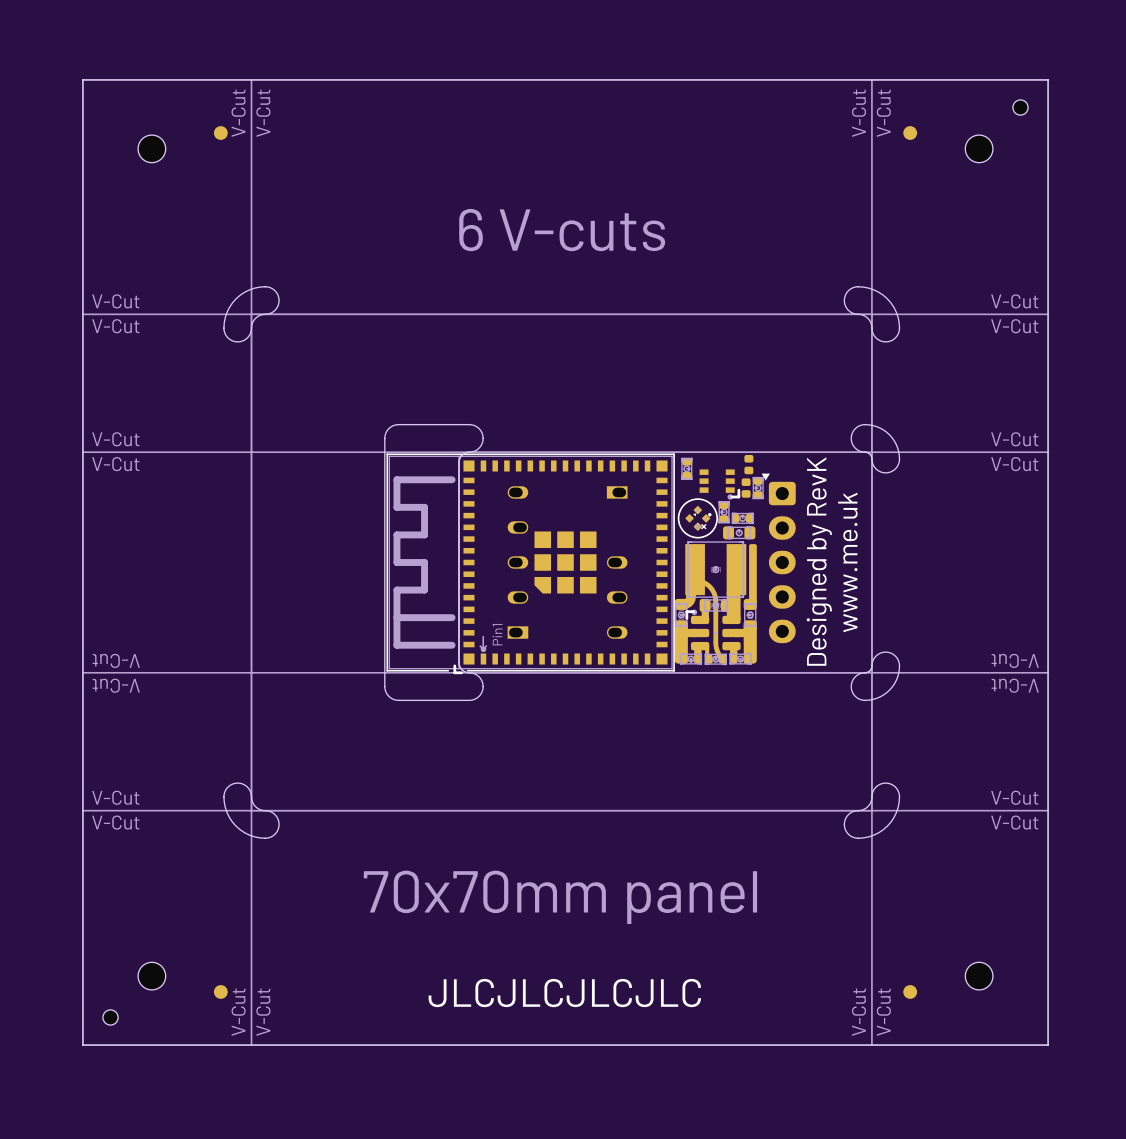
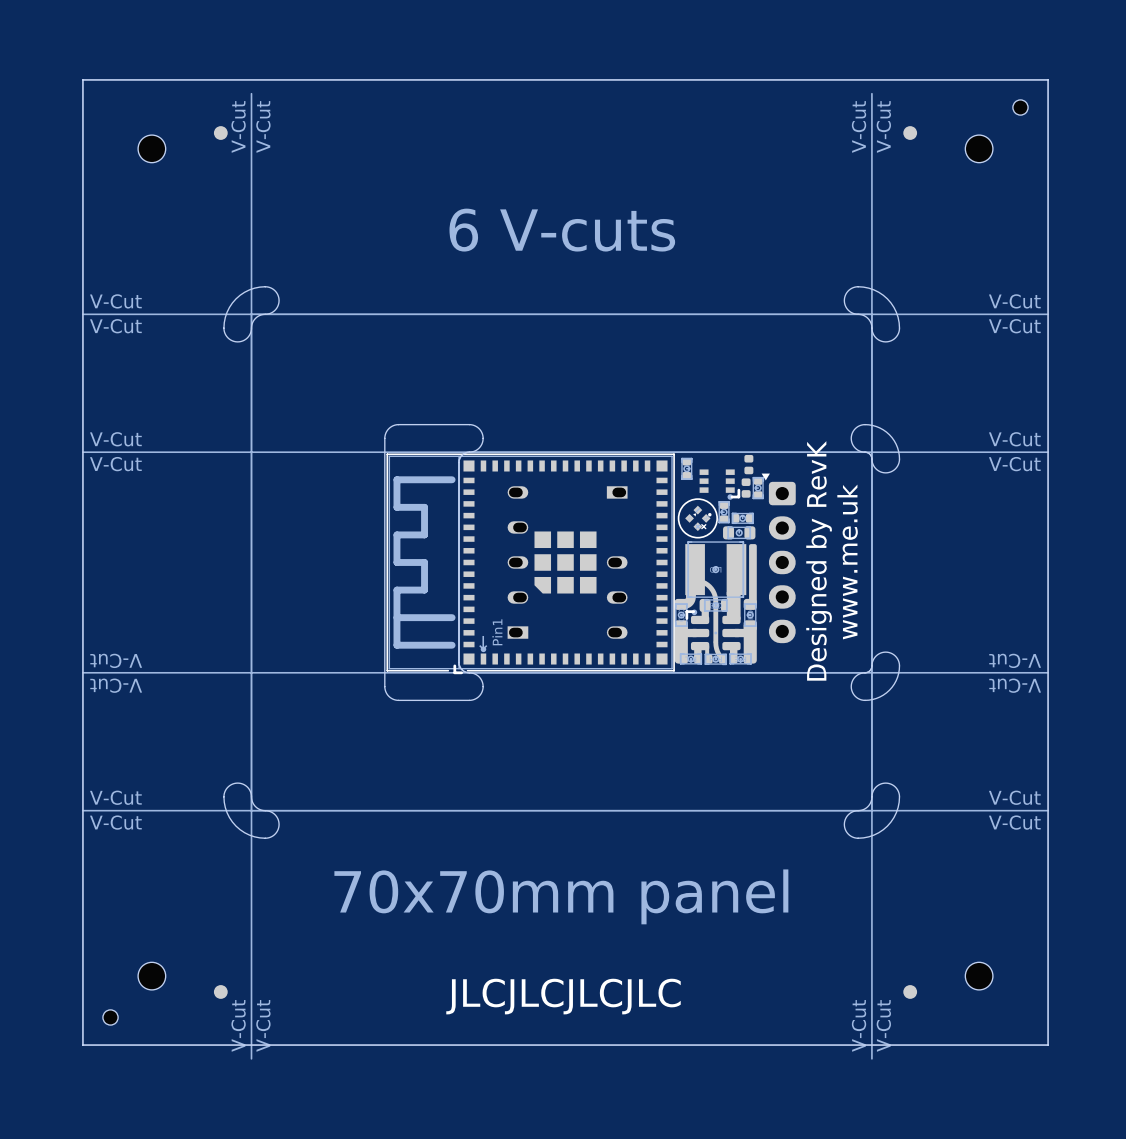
drawing position: (251, 562) -> (251, 576)
drawing position: (871, 562) -> (871, 576)

